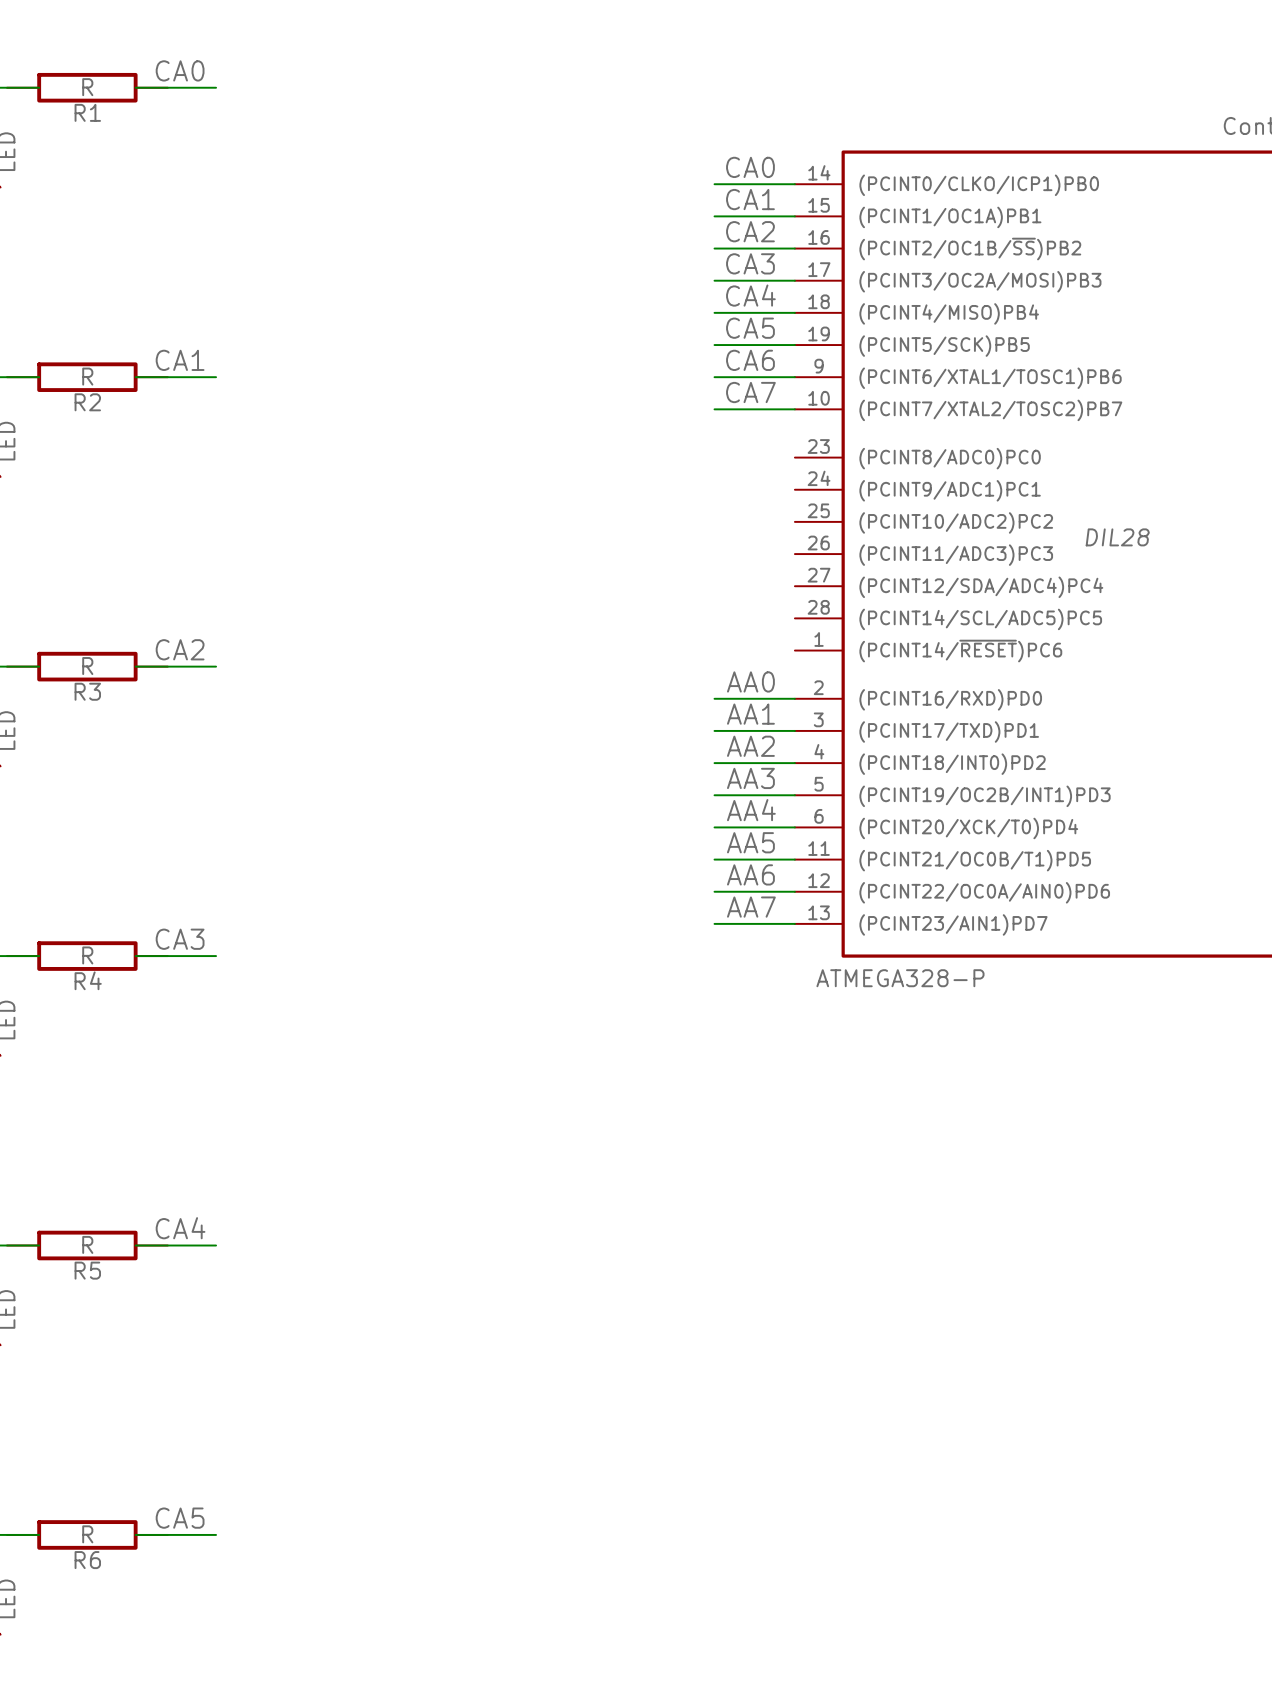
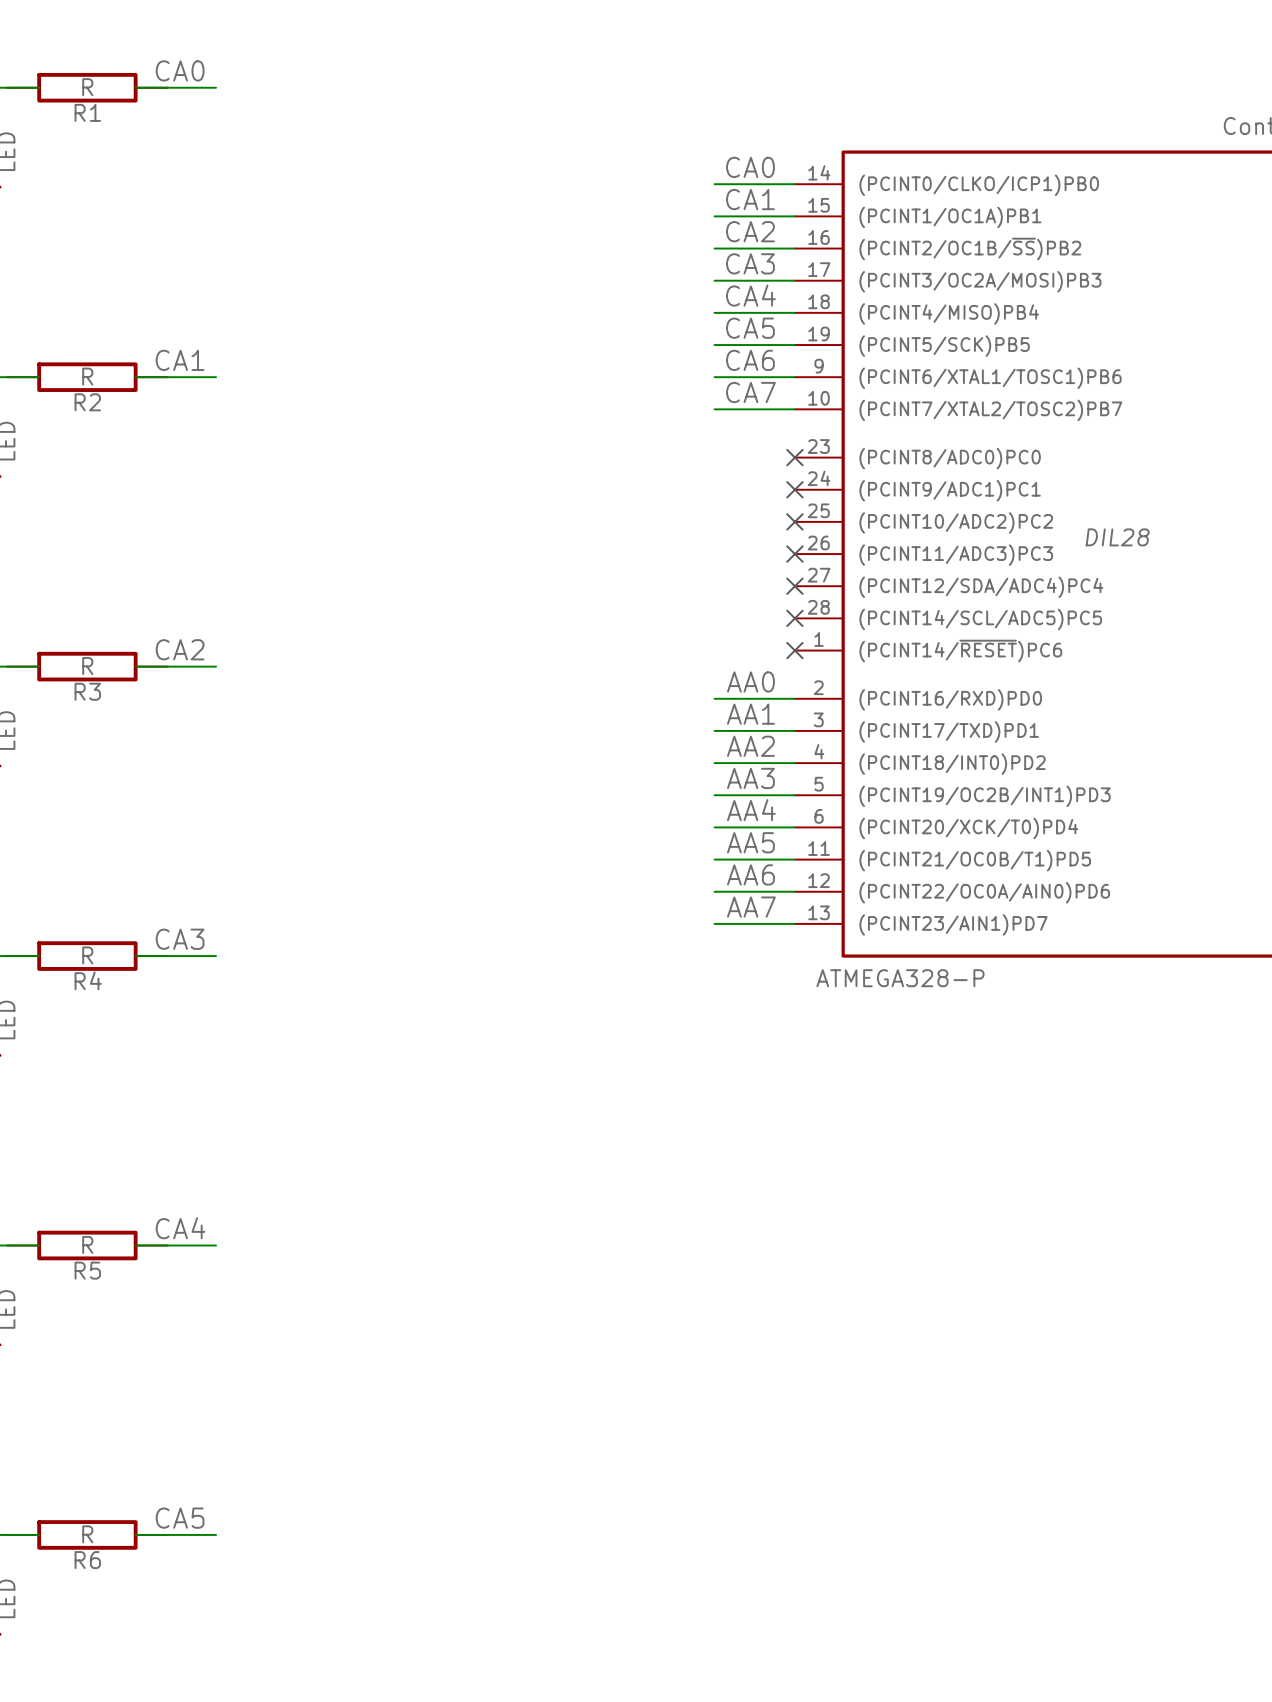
no-connect mark: none -> (794, 457)
no-connect mark: none -> (794, 489)
no-connect mark: none -> (794, 521)
no-connect mark: none -> (794, 554)
no-connect mark: none -> (794, 586)
no-connect mark: none -> (794, 618)
no-connect mark: none -> (794, 650)

